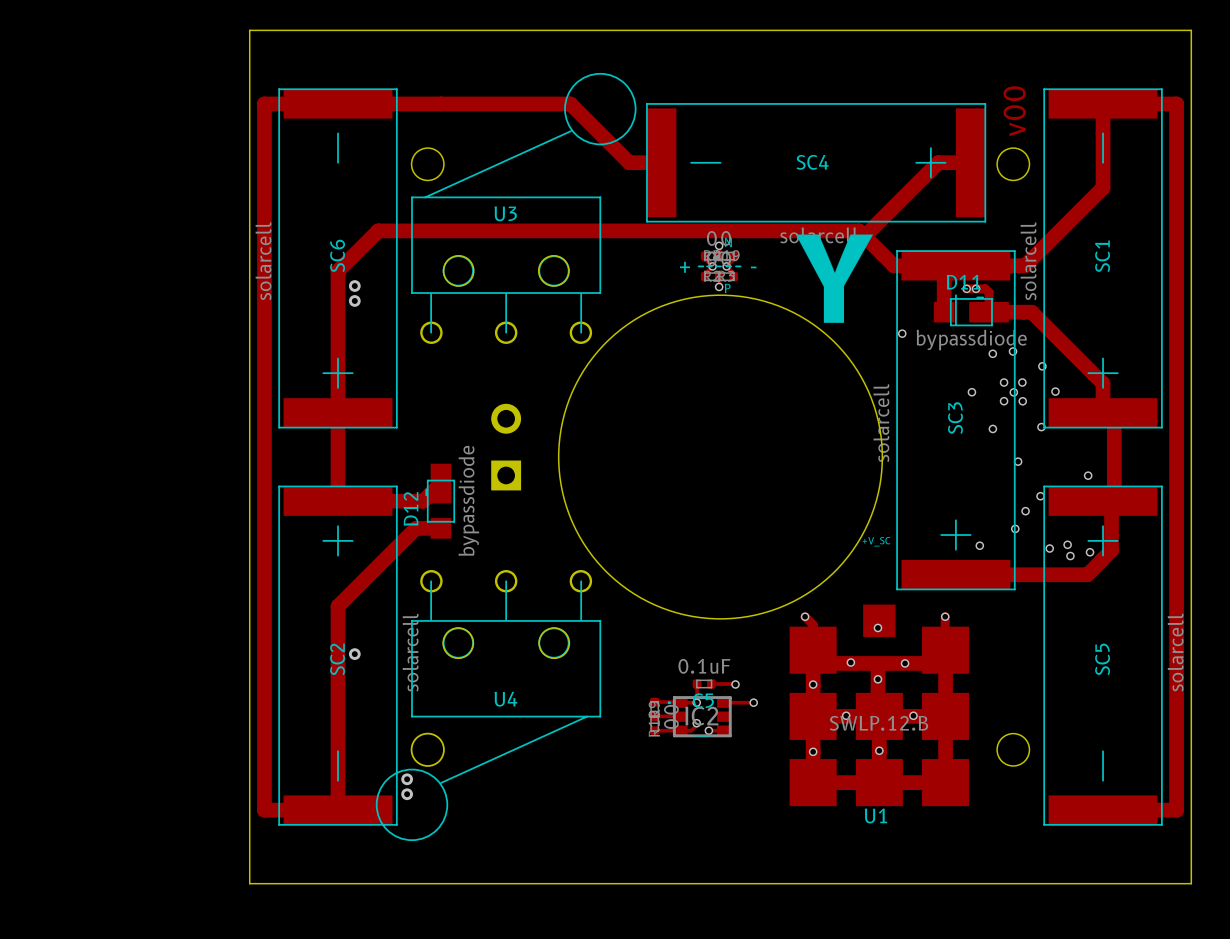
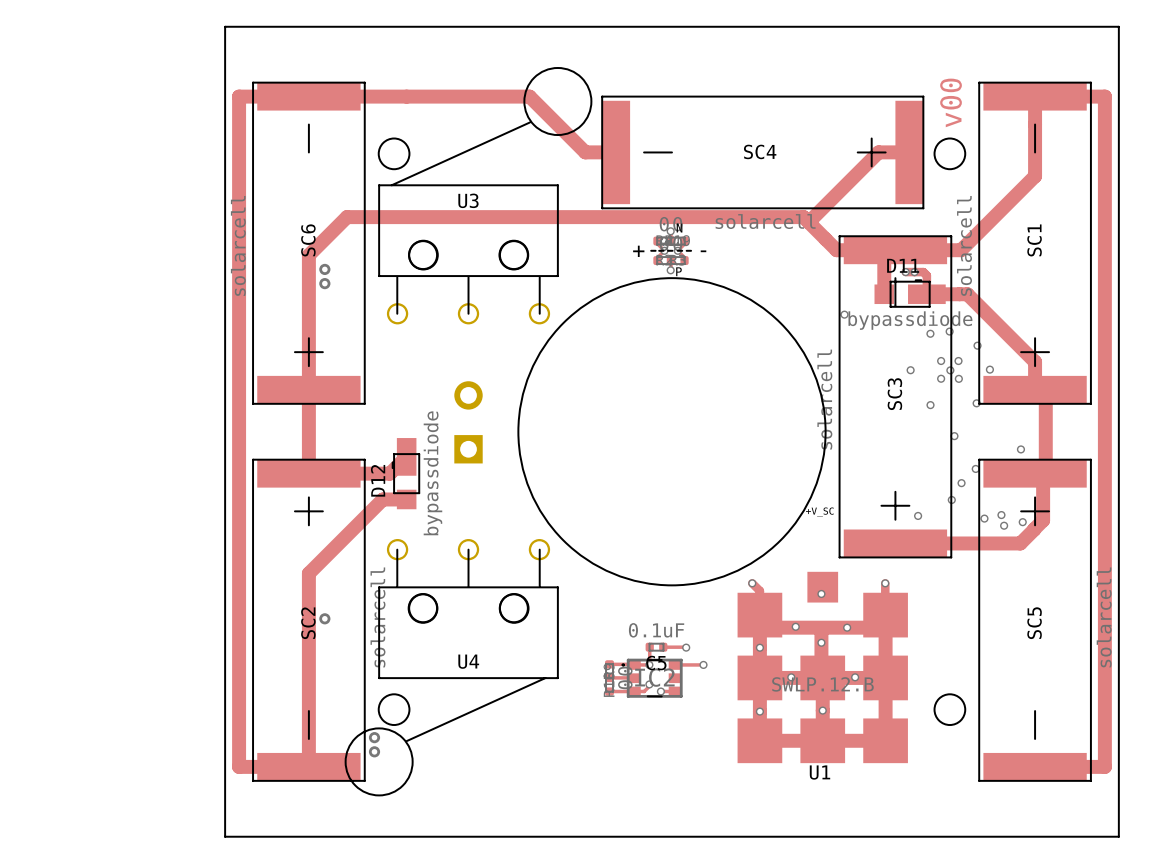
drawing: [796, 234, 874, 323] -> none

